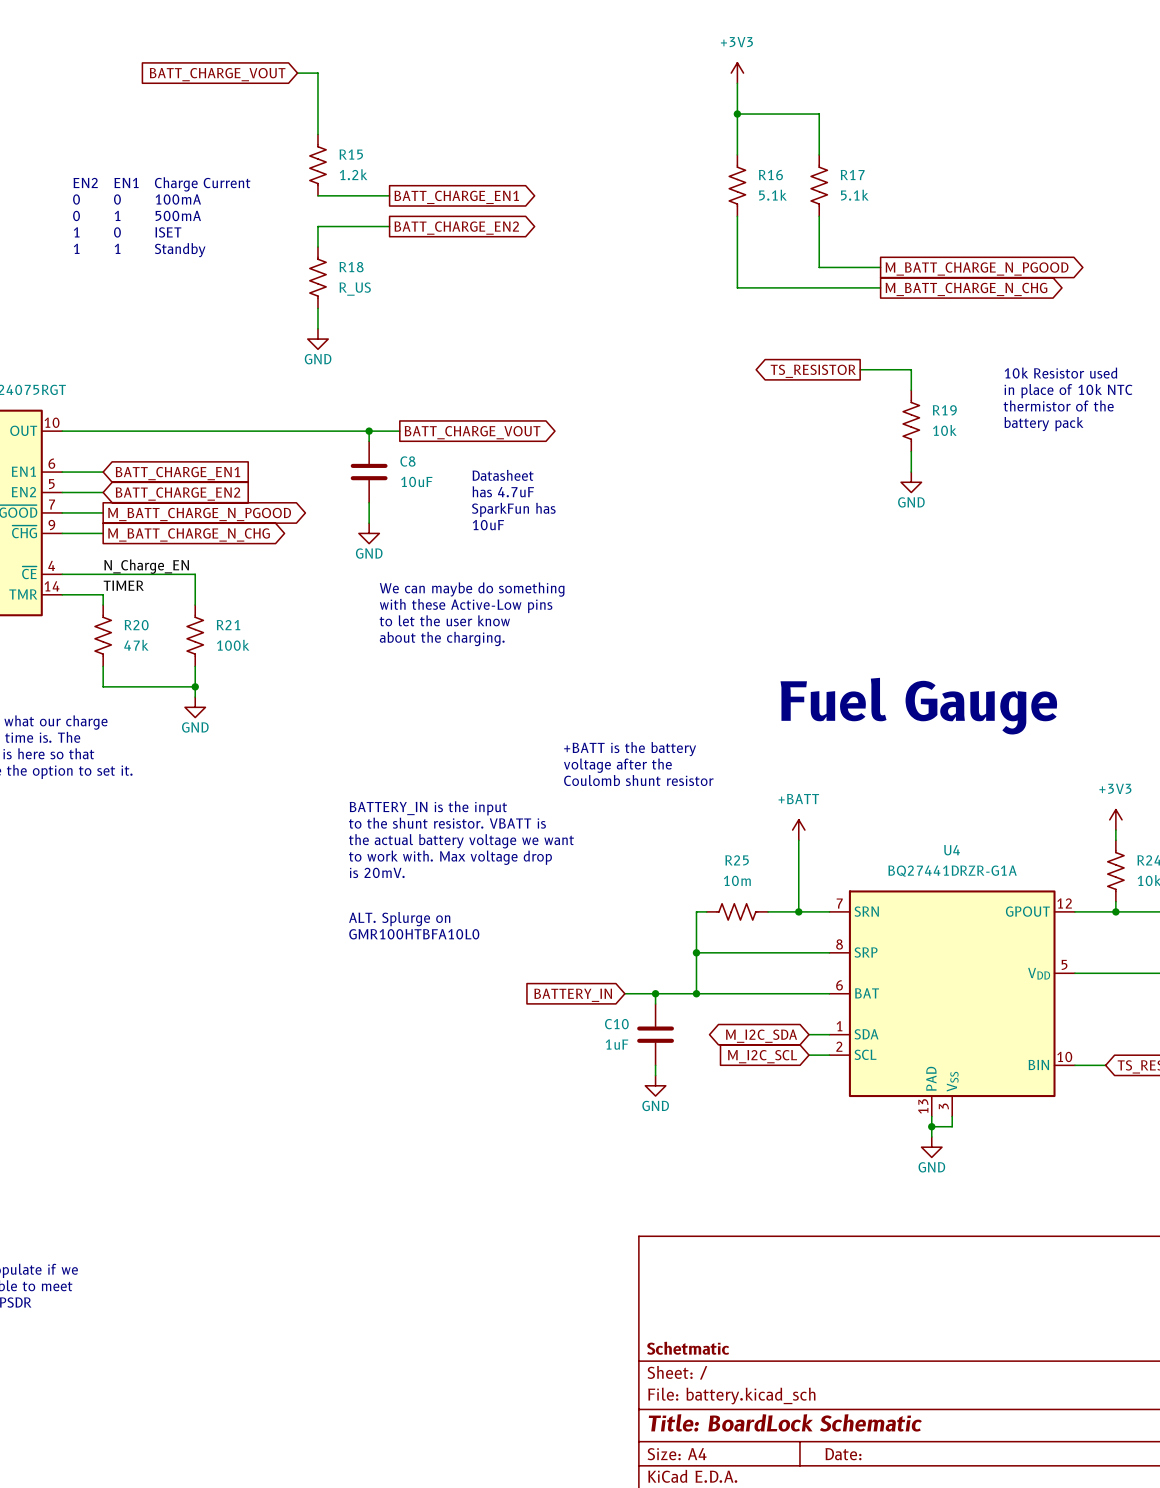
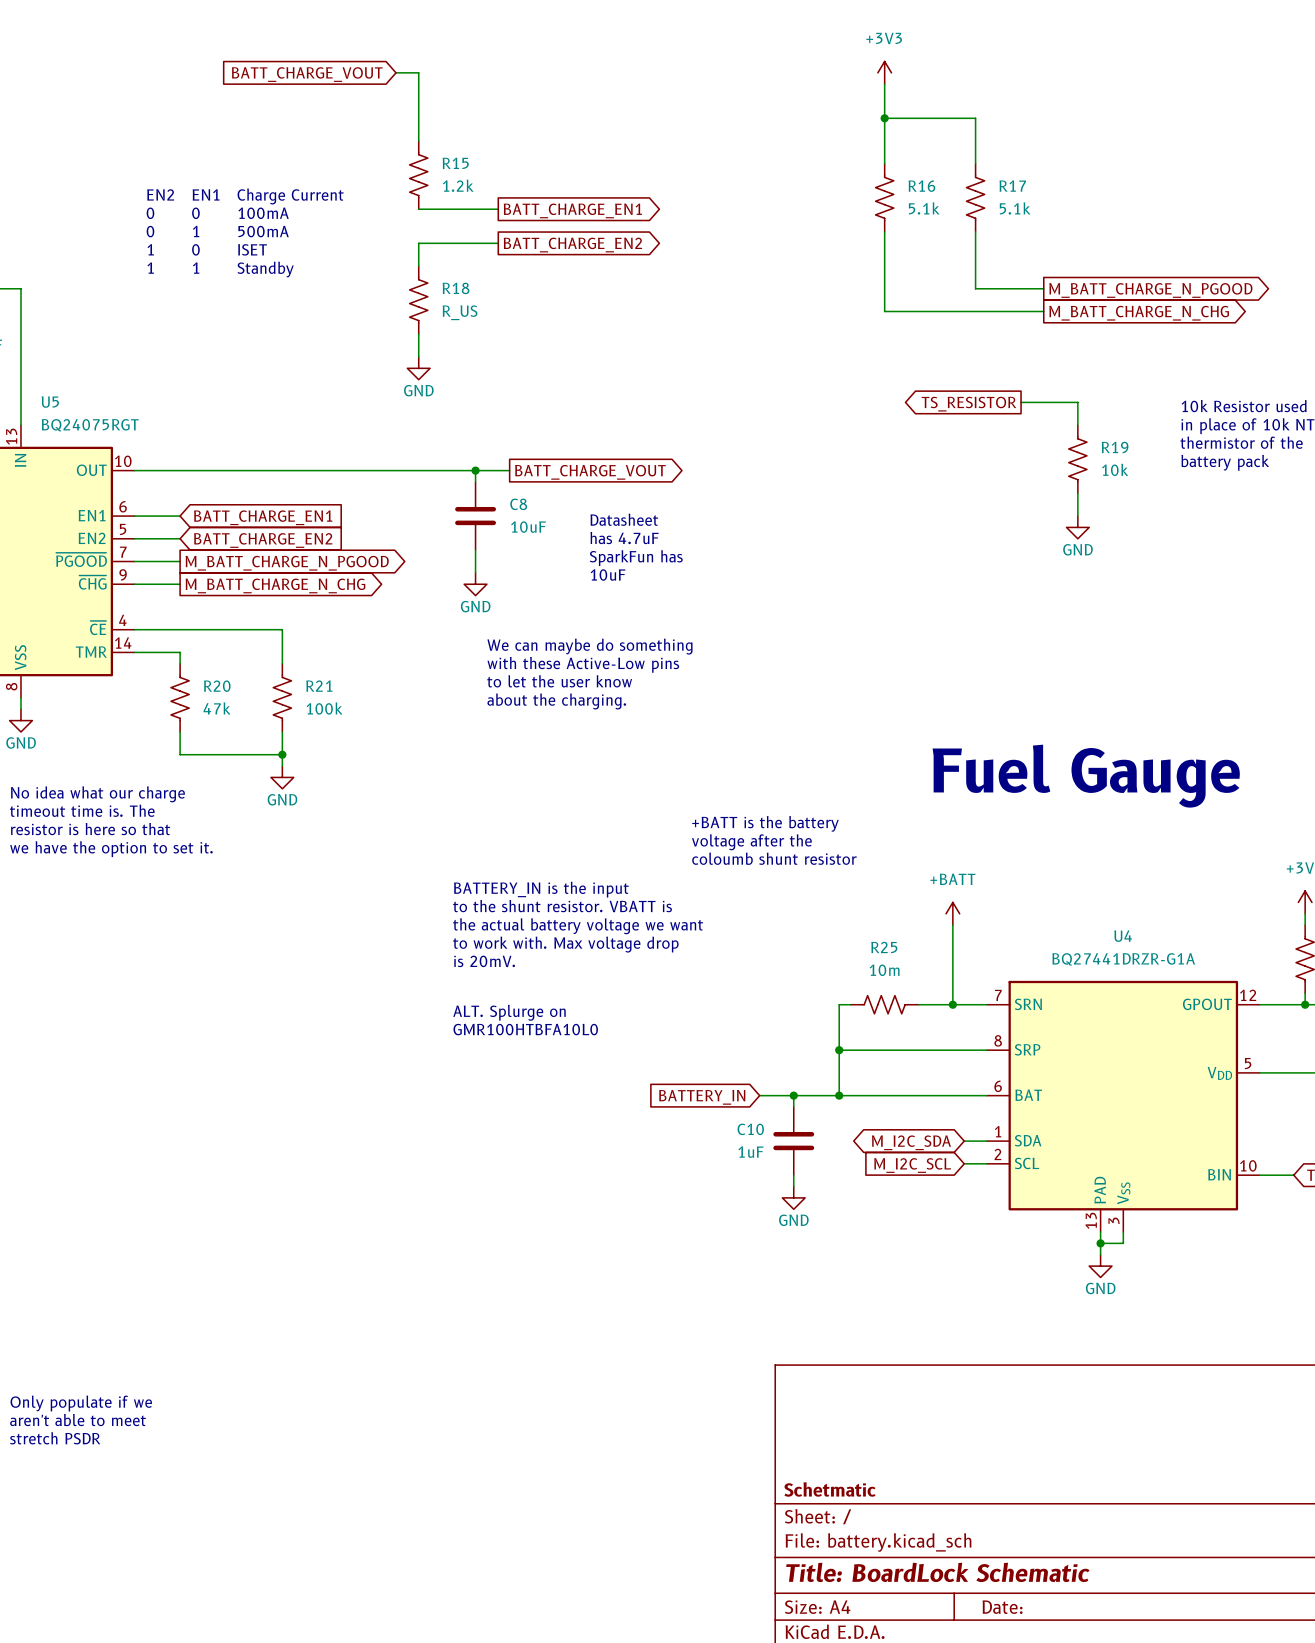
label: N_Charge_EN (146, 566) -> none
label: TIMER (123, 585) -> none
text: Coulomb shunt resistor (638, 780) -> coloumb shunt resistor (774, 858)

